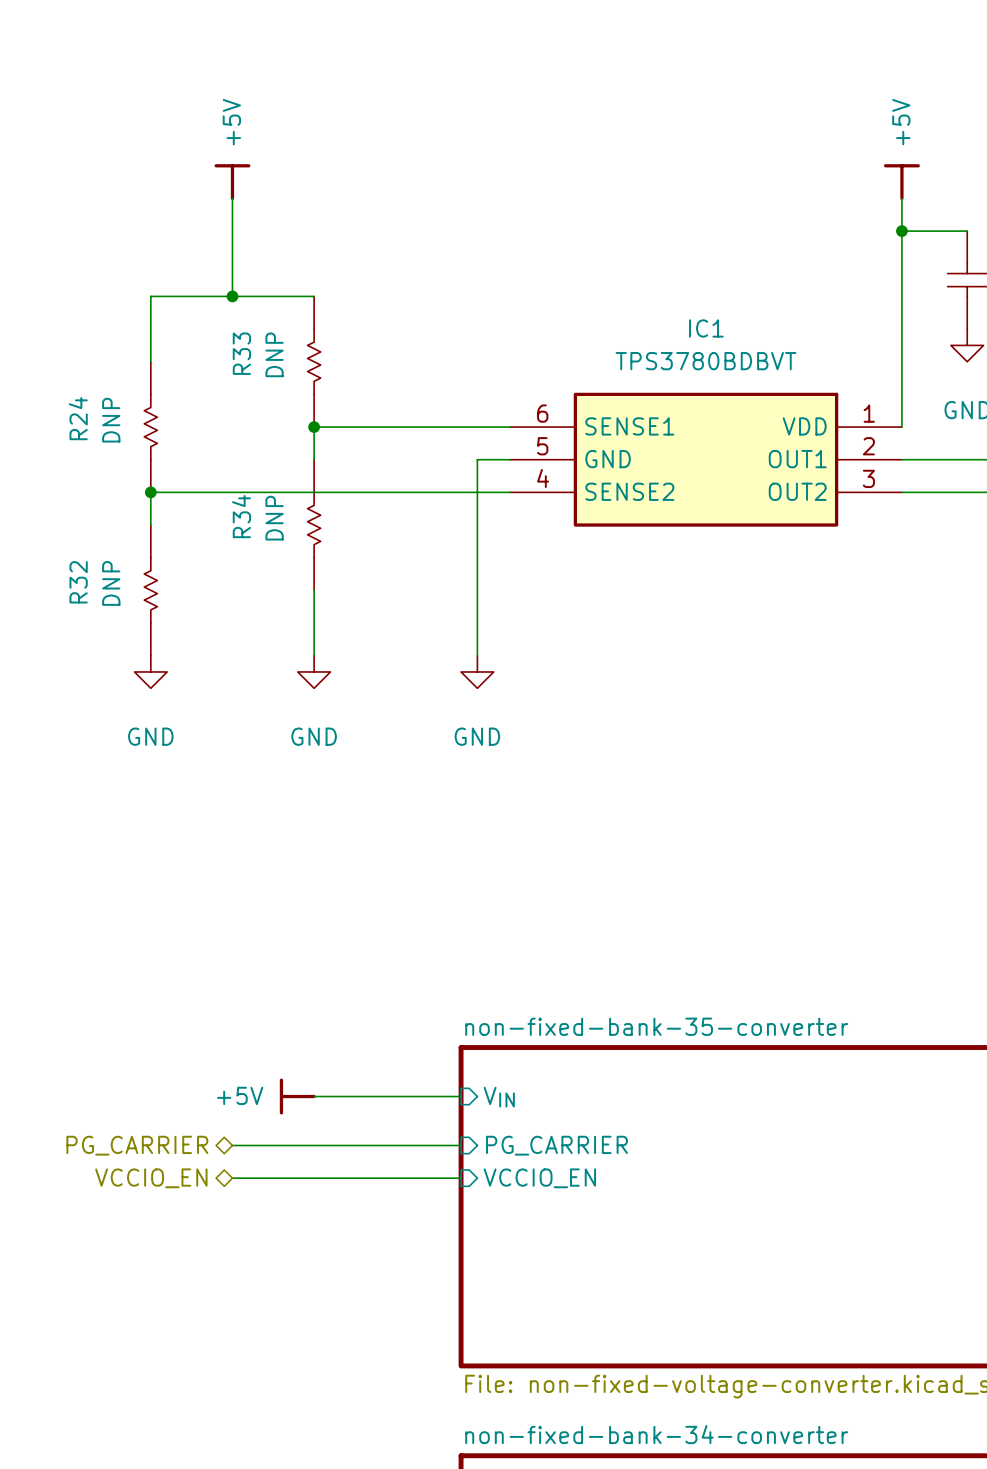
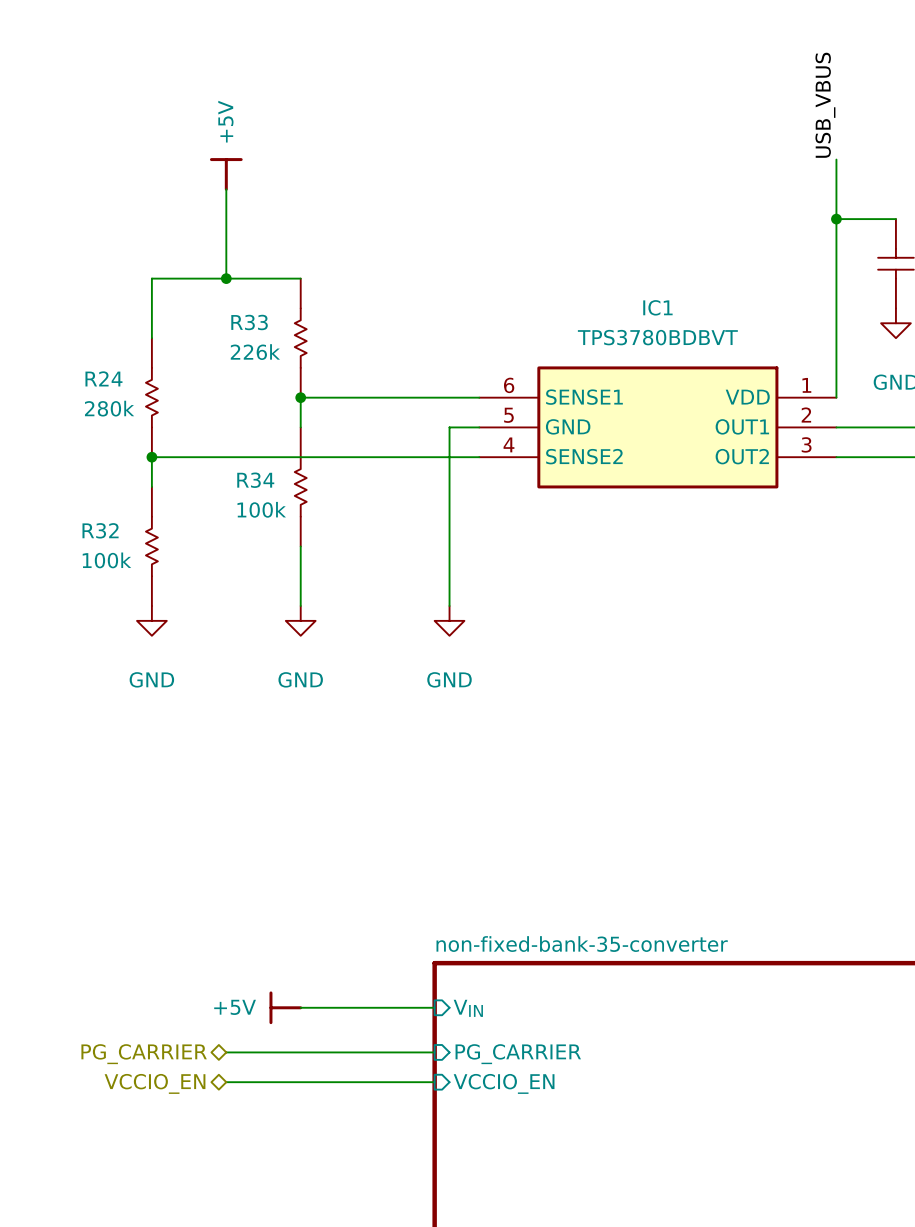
label: none -> USB_VBUS (825, 105)
power symbol: +5V (901, 182) -> none
R33 name rotation: 0° (241, 353) -> 90° clockwise (249, 322)
R33 value: DNP (274, 354) -> 226k (255, 352)
R24 name rotation: 0° (78, 418) -> 90° clockwise (103, 378)
R24 value: DNP (111, 420) -> 280k (109, 408)
R34 name rotation: 0° (241, 516) -> 90° clockwise (255, 480)
R34 value: DNP (274, 518) -> 100k (261, 509)
R32 name rotation: 0° (78, 582) -> 90° clockwise (100, 530)
R32 value: DNP (111, 583) -> 100k (106, 560)

